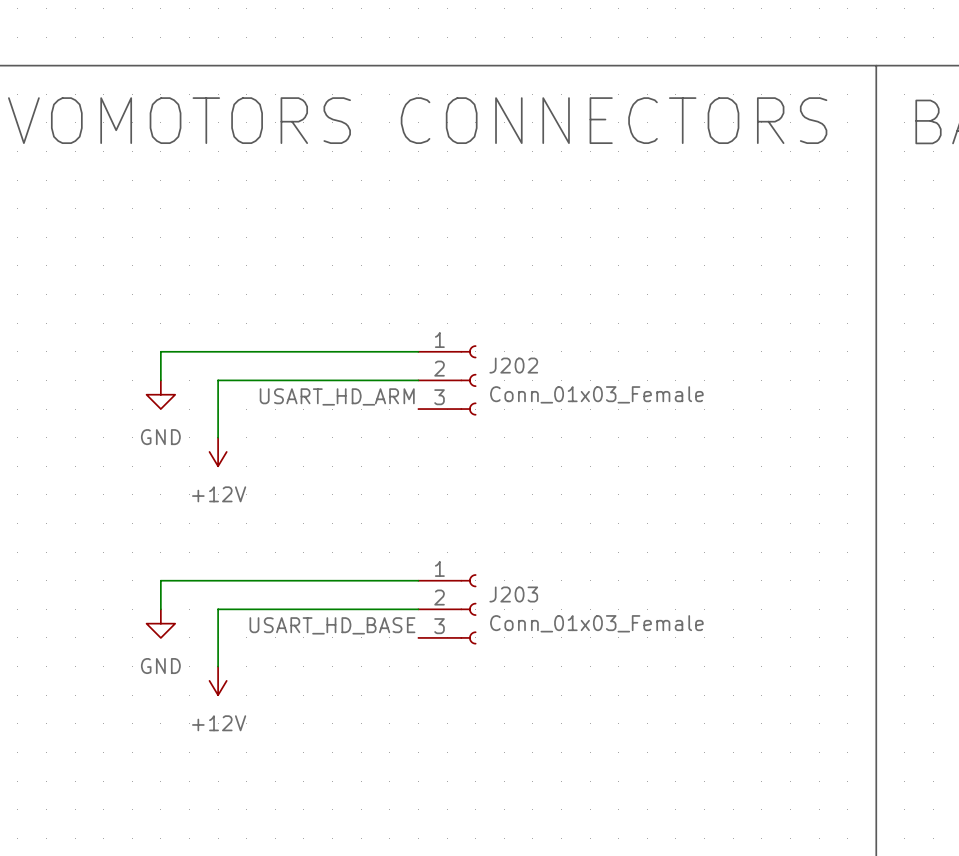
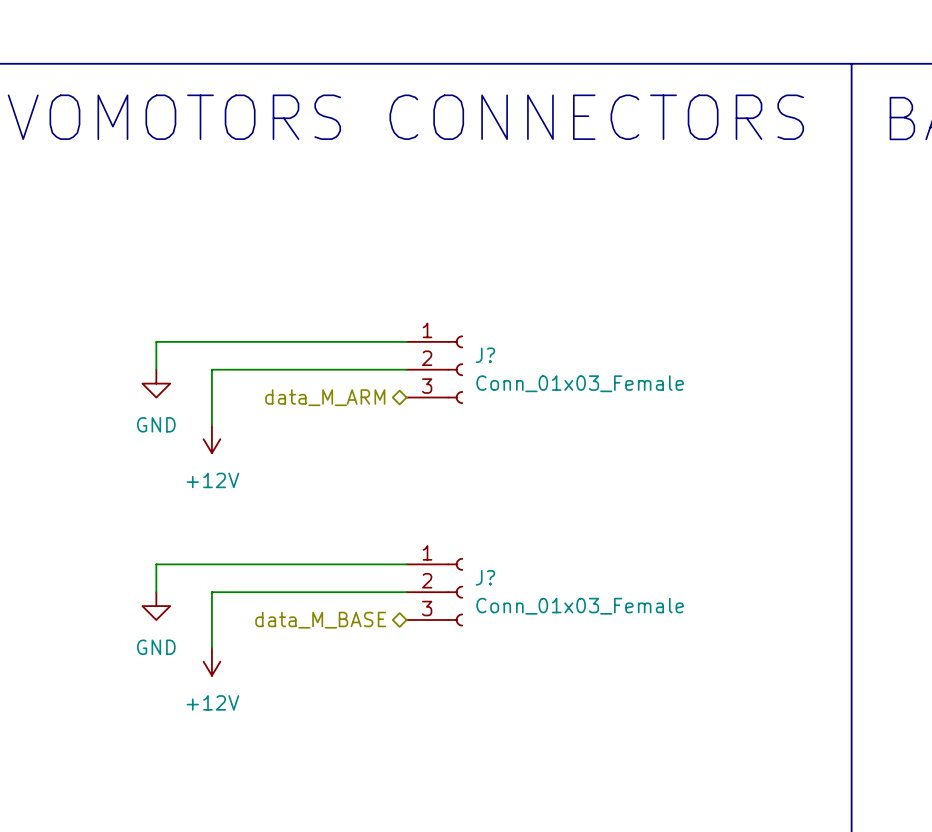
J202 name: J202 (513, 365) -> J? (485, 355)
label: USART_HD_ARM (337, 396) -> none
hierarchical label: none -> data_M_ARM (325, 397)
J203 name: J203 (513, 594) -> J? (485, 577)
label: USART_HD_BASE (332, 625) -> none
hierarchical label: none -> data_M_BASE (320, 620)

